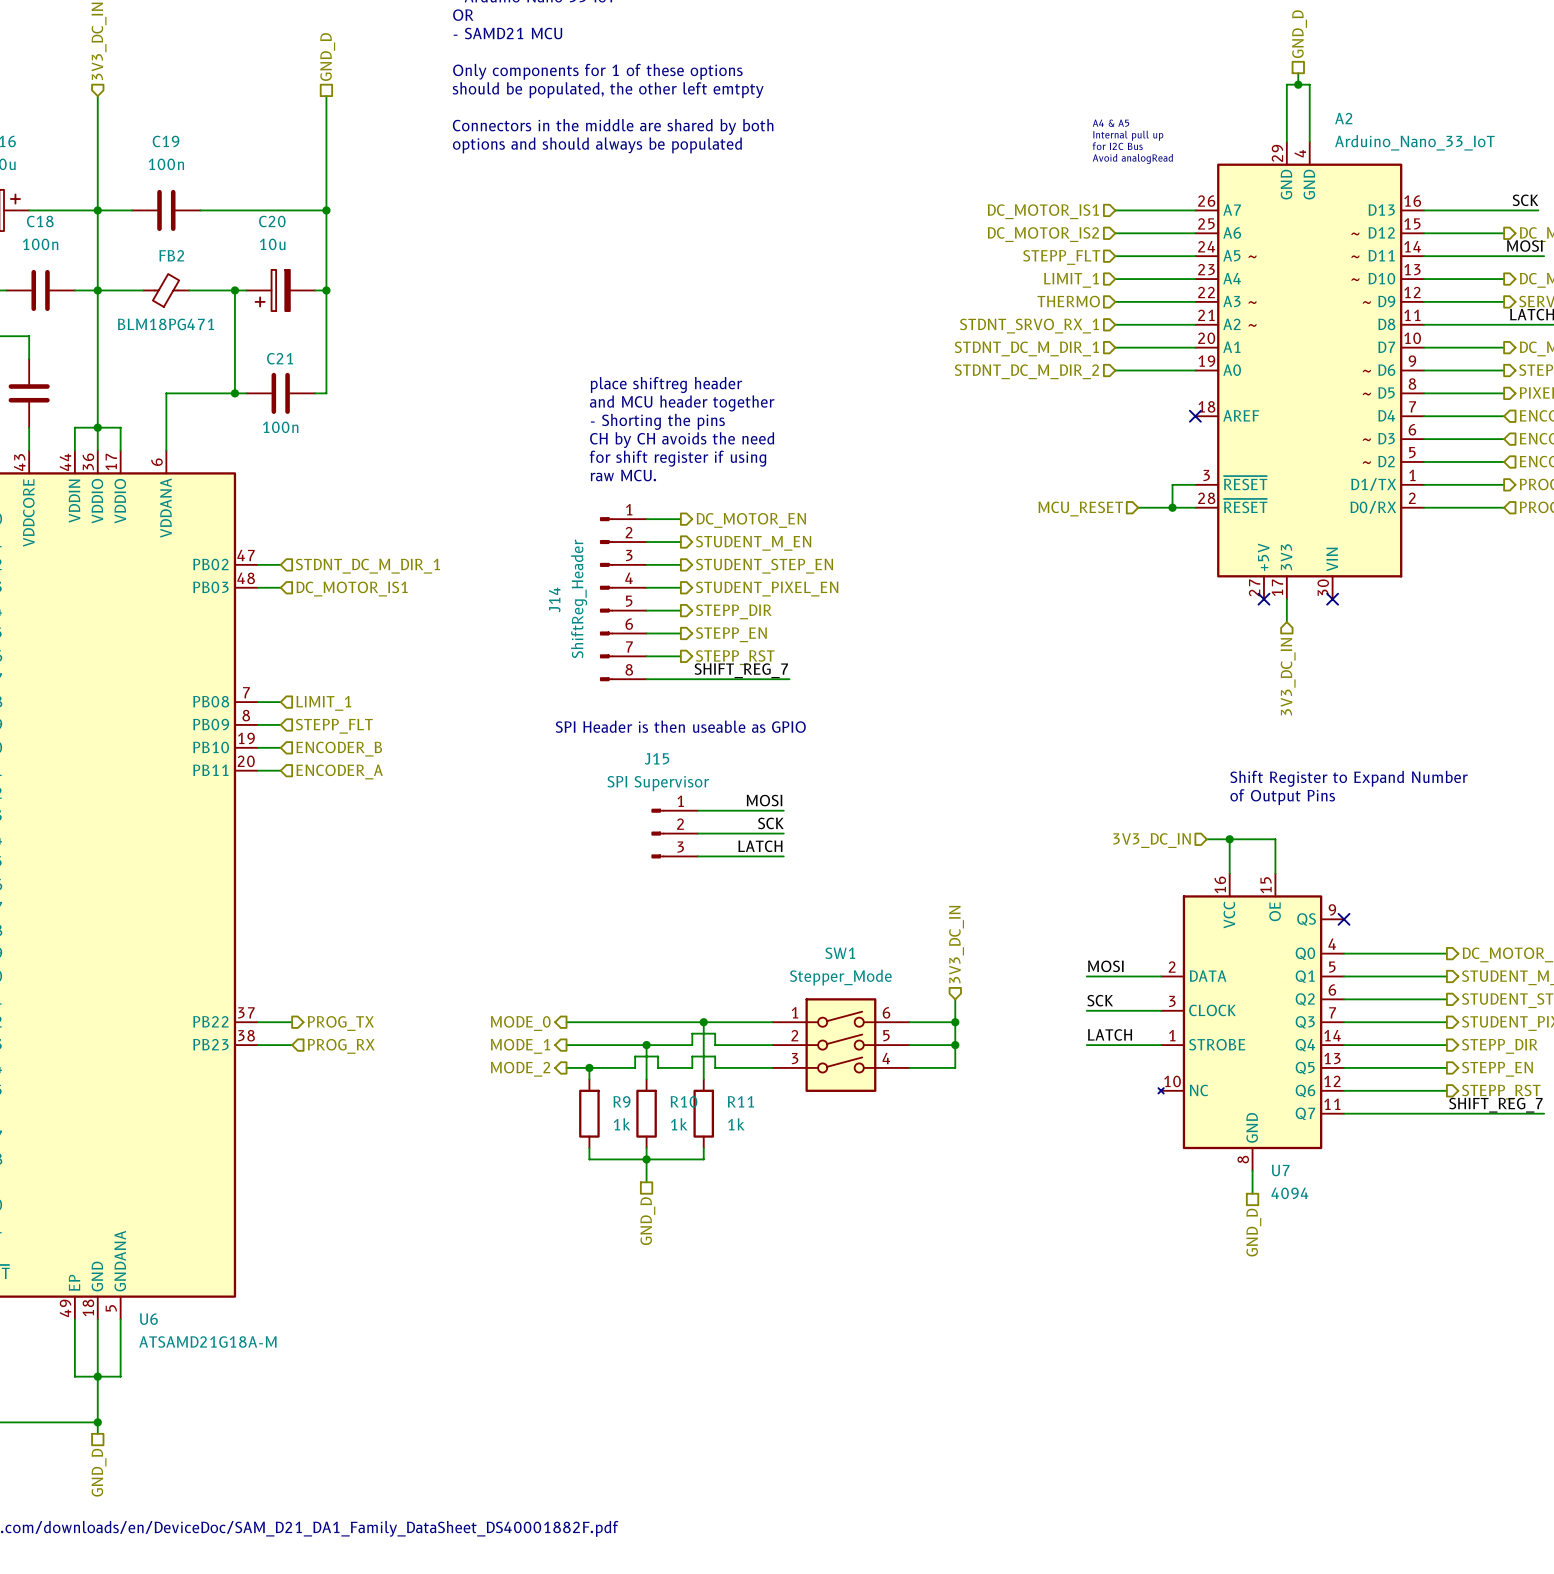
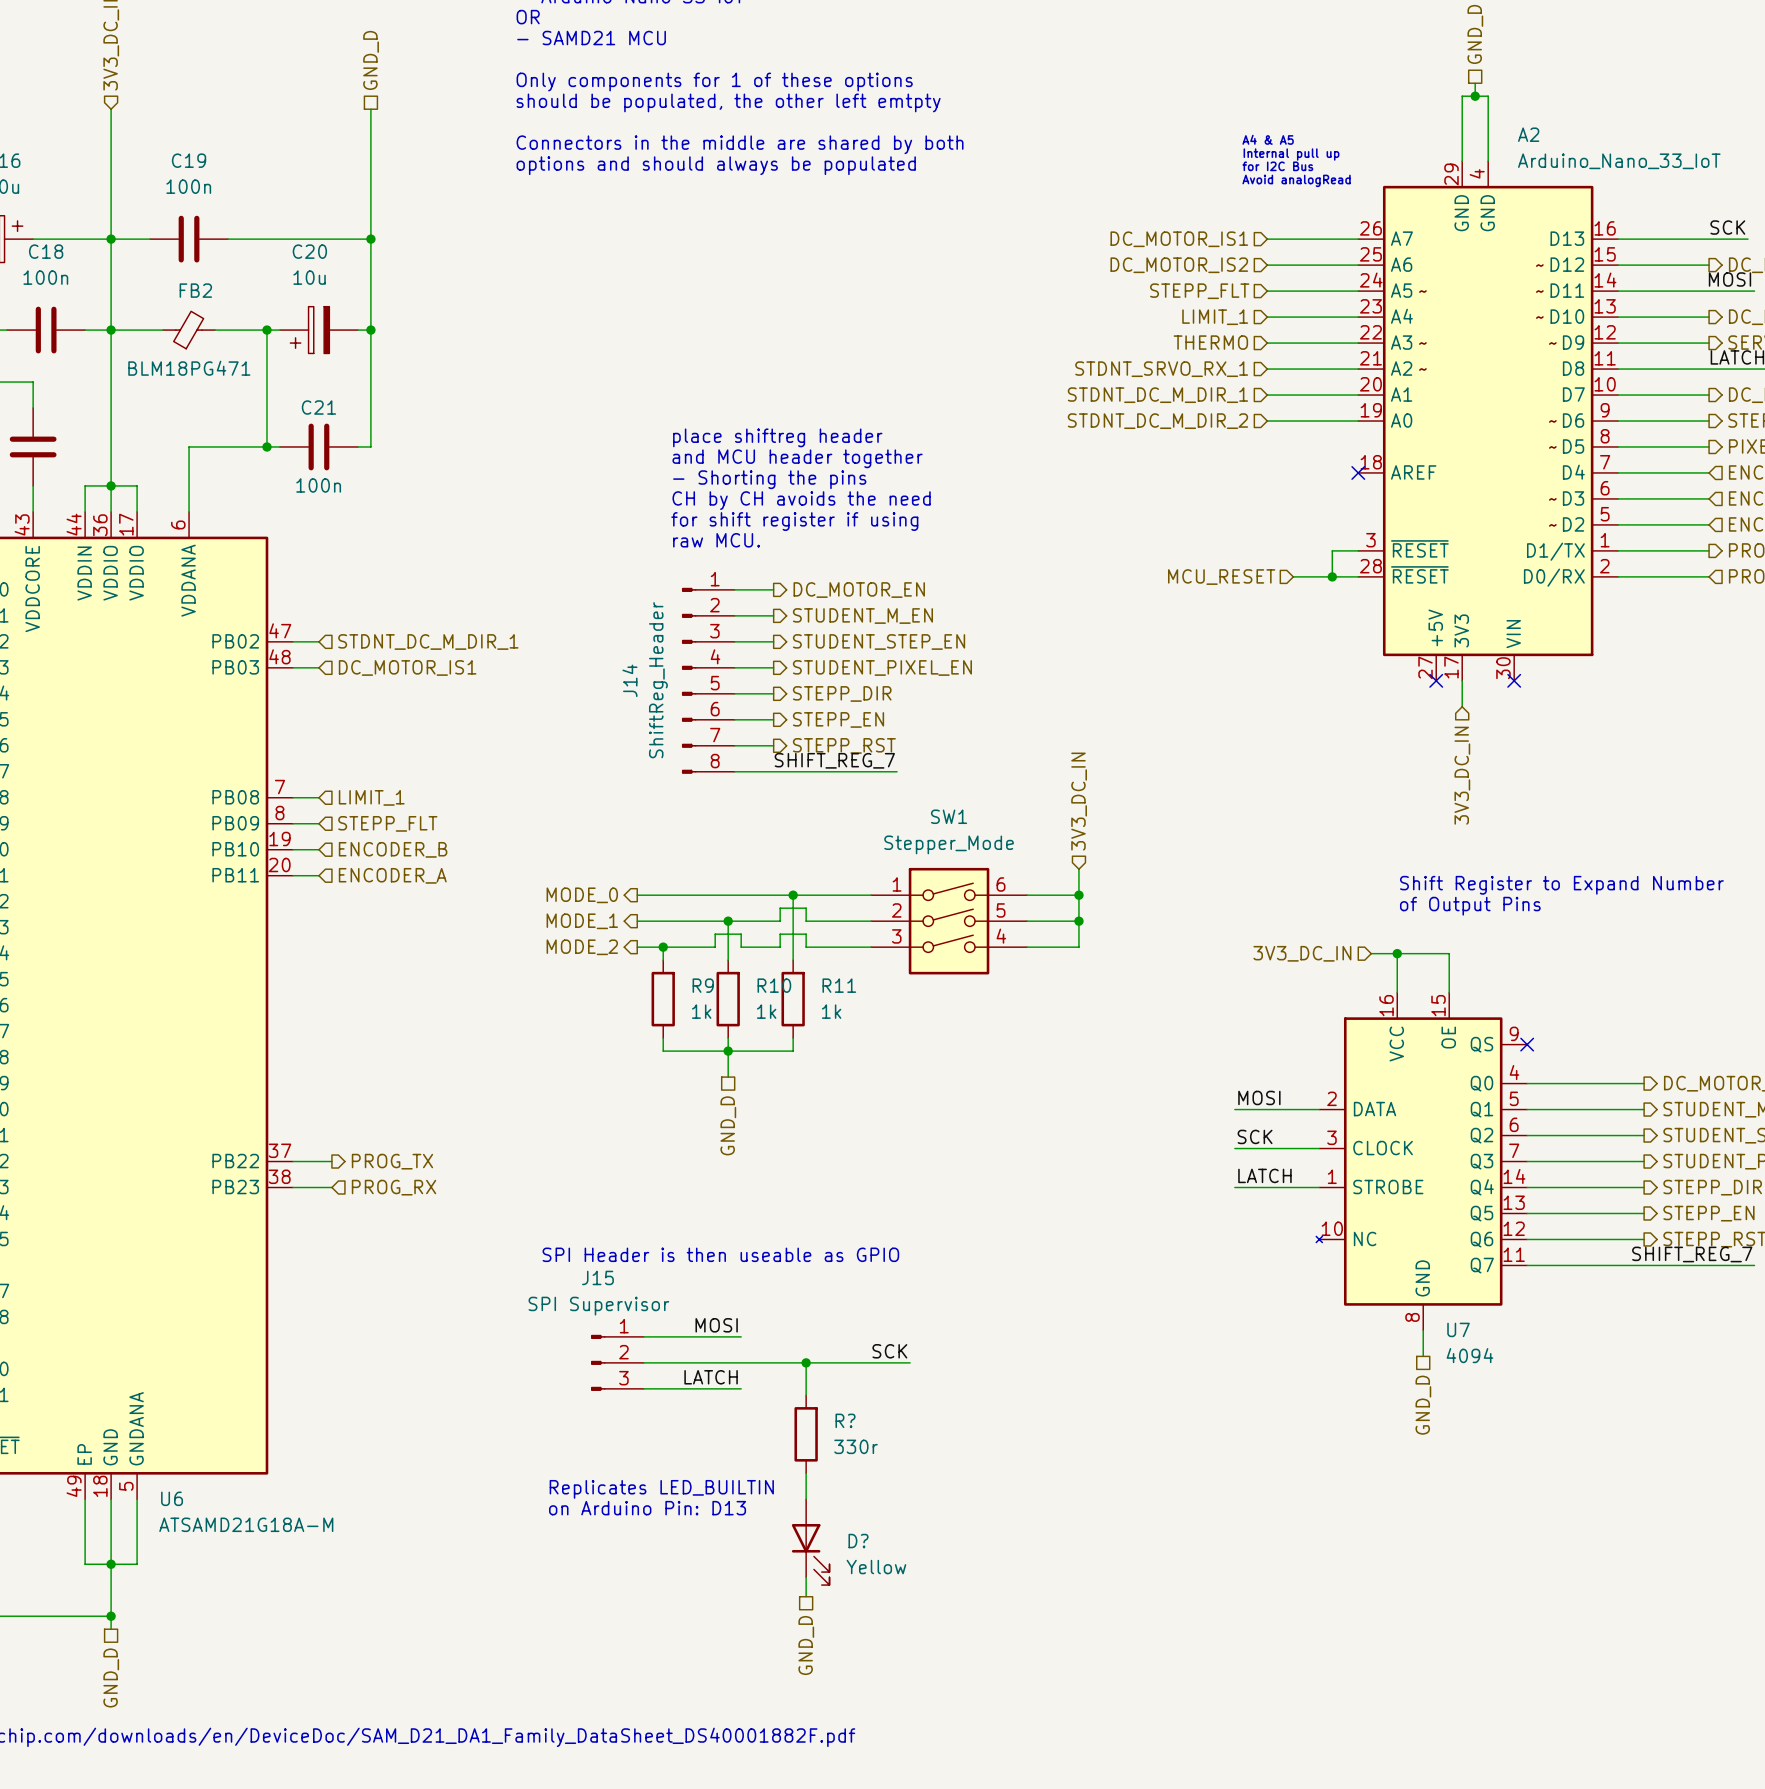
hierarchical label: none -> 3V3_DC_IN (1079, 801)
text: SPI Header is then useable as GPIO (680, 726) -> none
wire: none -> (1078, 869) (1078, 947) (1026, 947)
wire: none -> (637, 895) (871, 895)
wire: none -> (793, 895) (793, 960)
junction: none -> (793, 895)
wire: none -> (1026, 895) (1078, 895)
junction: none -> (1078, 895)
hierarchical label: none -> MODE_0 (582, 895)
label: MOSI (764, 800) -> none
wire: none -> (728, 921) (728, 960)
junction: none -> (728, 921)
wire: (698, 810) (709, 810) -> (637, 921) (780, 921) (780, 908) (806, 908) (806, 921)
junction: none -> (1078, 921)
hierarchical label: none -> MODE_1 (582, 921)
label: SCK (770, 823) -> none
wire: none -> (663, 947) (663, 960)
junction: none -> (663, 947)
J15 position: (674, 833) -> (617, 1362)
wire: (698, 833) (709, 833) -> (637, 947) (715, 947) (715, 934) (741, 934) (741, 947) (780, 947) (780, 934) (806, 934) (806, 947)
hierarchical label: none -> MODE_2 (582, 947)
label: LATCH (760, 846) -> none
wire: (698, 856) (783, 856) -> none
wire: none -> (663, 1038) (663, 1051) (793, 1051) (793, 1038)
junction: none -> (728, 1051)
hierarchical label: 3V3_DC_IN (956, 944) -> none
hierarchical label: none -> GND_D (728, 1125)
wire: (955, 999) (955, 1067) (909, 1067) -> none
wire: (566, 1022) (772, 1022) -> none
wire: (703, 1022) (703, 1079) -> none
junction: (703, 1022) -> none
wire: (909, 1022) (955, 1022) -> (1026, 921) (1078, 921)
junction: (955, 1022) -> none
hierarchical label: MODE_0 (520, 1023) -> none
wire: (566, 1045) (692, 1045) (692, 1033) (715, 1033) (715, 1045) (772, 1045) -> none
wire: (646, 1045) (646, 1079) -> (728, 1038) (728, 1077)
junction: (646, 1045) -> none
SW1 position: (840, 1045) -> (949, 921)
wire: (909, 1045) (955, 1045) -> none
junction: (955, 1045) -> none
hierarchical label: MODE_1 (520, 1046) -> none
wire: (566, 1067) (635, 1067) (635, 1056) (658, 1056) (658, 1067) (692, 1067) (692, 1056) (715, 1056) (715, 1067) (772, 1067) -> none
wire: (589, 1067) (589, 1079) -> none
junction: (589, 1067) -> none
hierarchical label: MODE_2 (520, 1069) -> none
text: none -> SPI Header is then useable as GPIO (720, 1254)
R9 position: (589, 1113) -> (663, 999)
R10 position: (646, 1113) -> (728, 999)
R11 position: (703, 1113) -> (793, 999)
wire: (589, 1147) (589, 1159) (703, 1159) (703, 1147) -> none
wire: (646, 1147) (646, 1182) -> none
junction: (646, 1159) -> none
label: none -> MOSI (716, 1325)
wire: none -> (643, 1336) (741, 1336)
label: none -> SCK (889, 1351)
wire: none -> (643, 1362) (910, 1362)
wire: none -> (806, 1362) (806, 1395)
junction: none -> (806, 1362)
label: none -> LATCH (711, 1377)
hierarchical label: GND_D (647, 1221) -> none
wire: none -> (643, 1388) (741, 1388)
R?: none -> 330r (806, 1434)
wire: none -> (806, 1473) (806, 1499)
text: none -> Replicates LED_BUILTIN (661, 1489)
text: none -> on Arduino Pin: D13 (647, 1508)
D?: none -> Yellow (810, 1542)
wire: none -> (806, 1577) (806, 1596)
hierarchical label: none -> GND_D (806, 1645)

